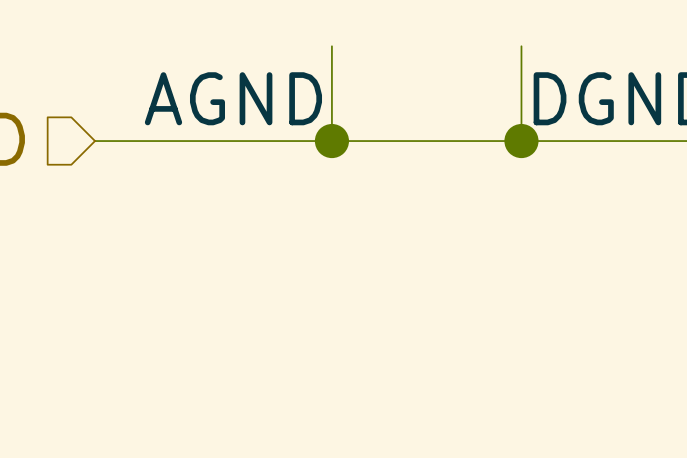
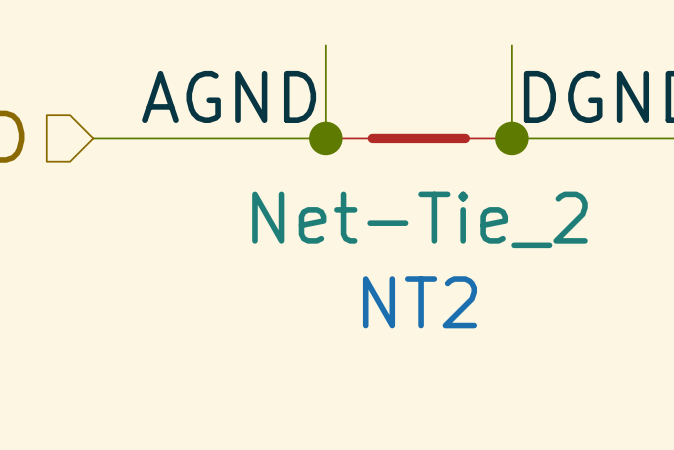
NT2: none -> Net-Tie_2 (418, 138)

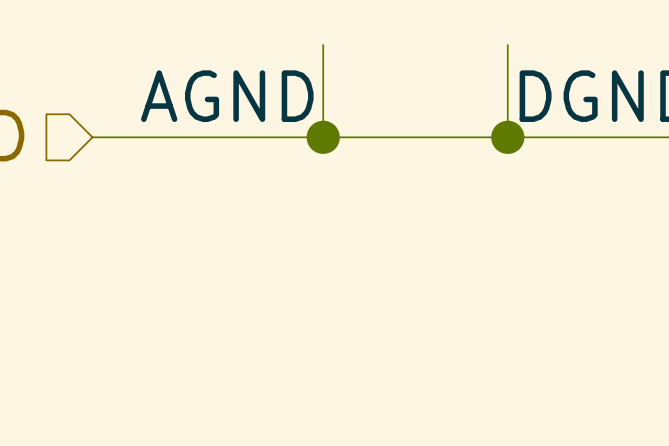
NT2: Net-Tie_2 (418, 138) -> none

